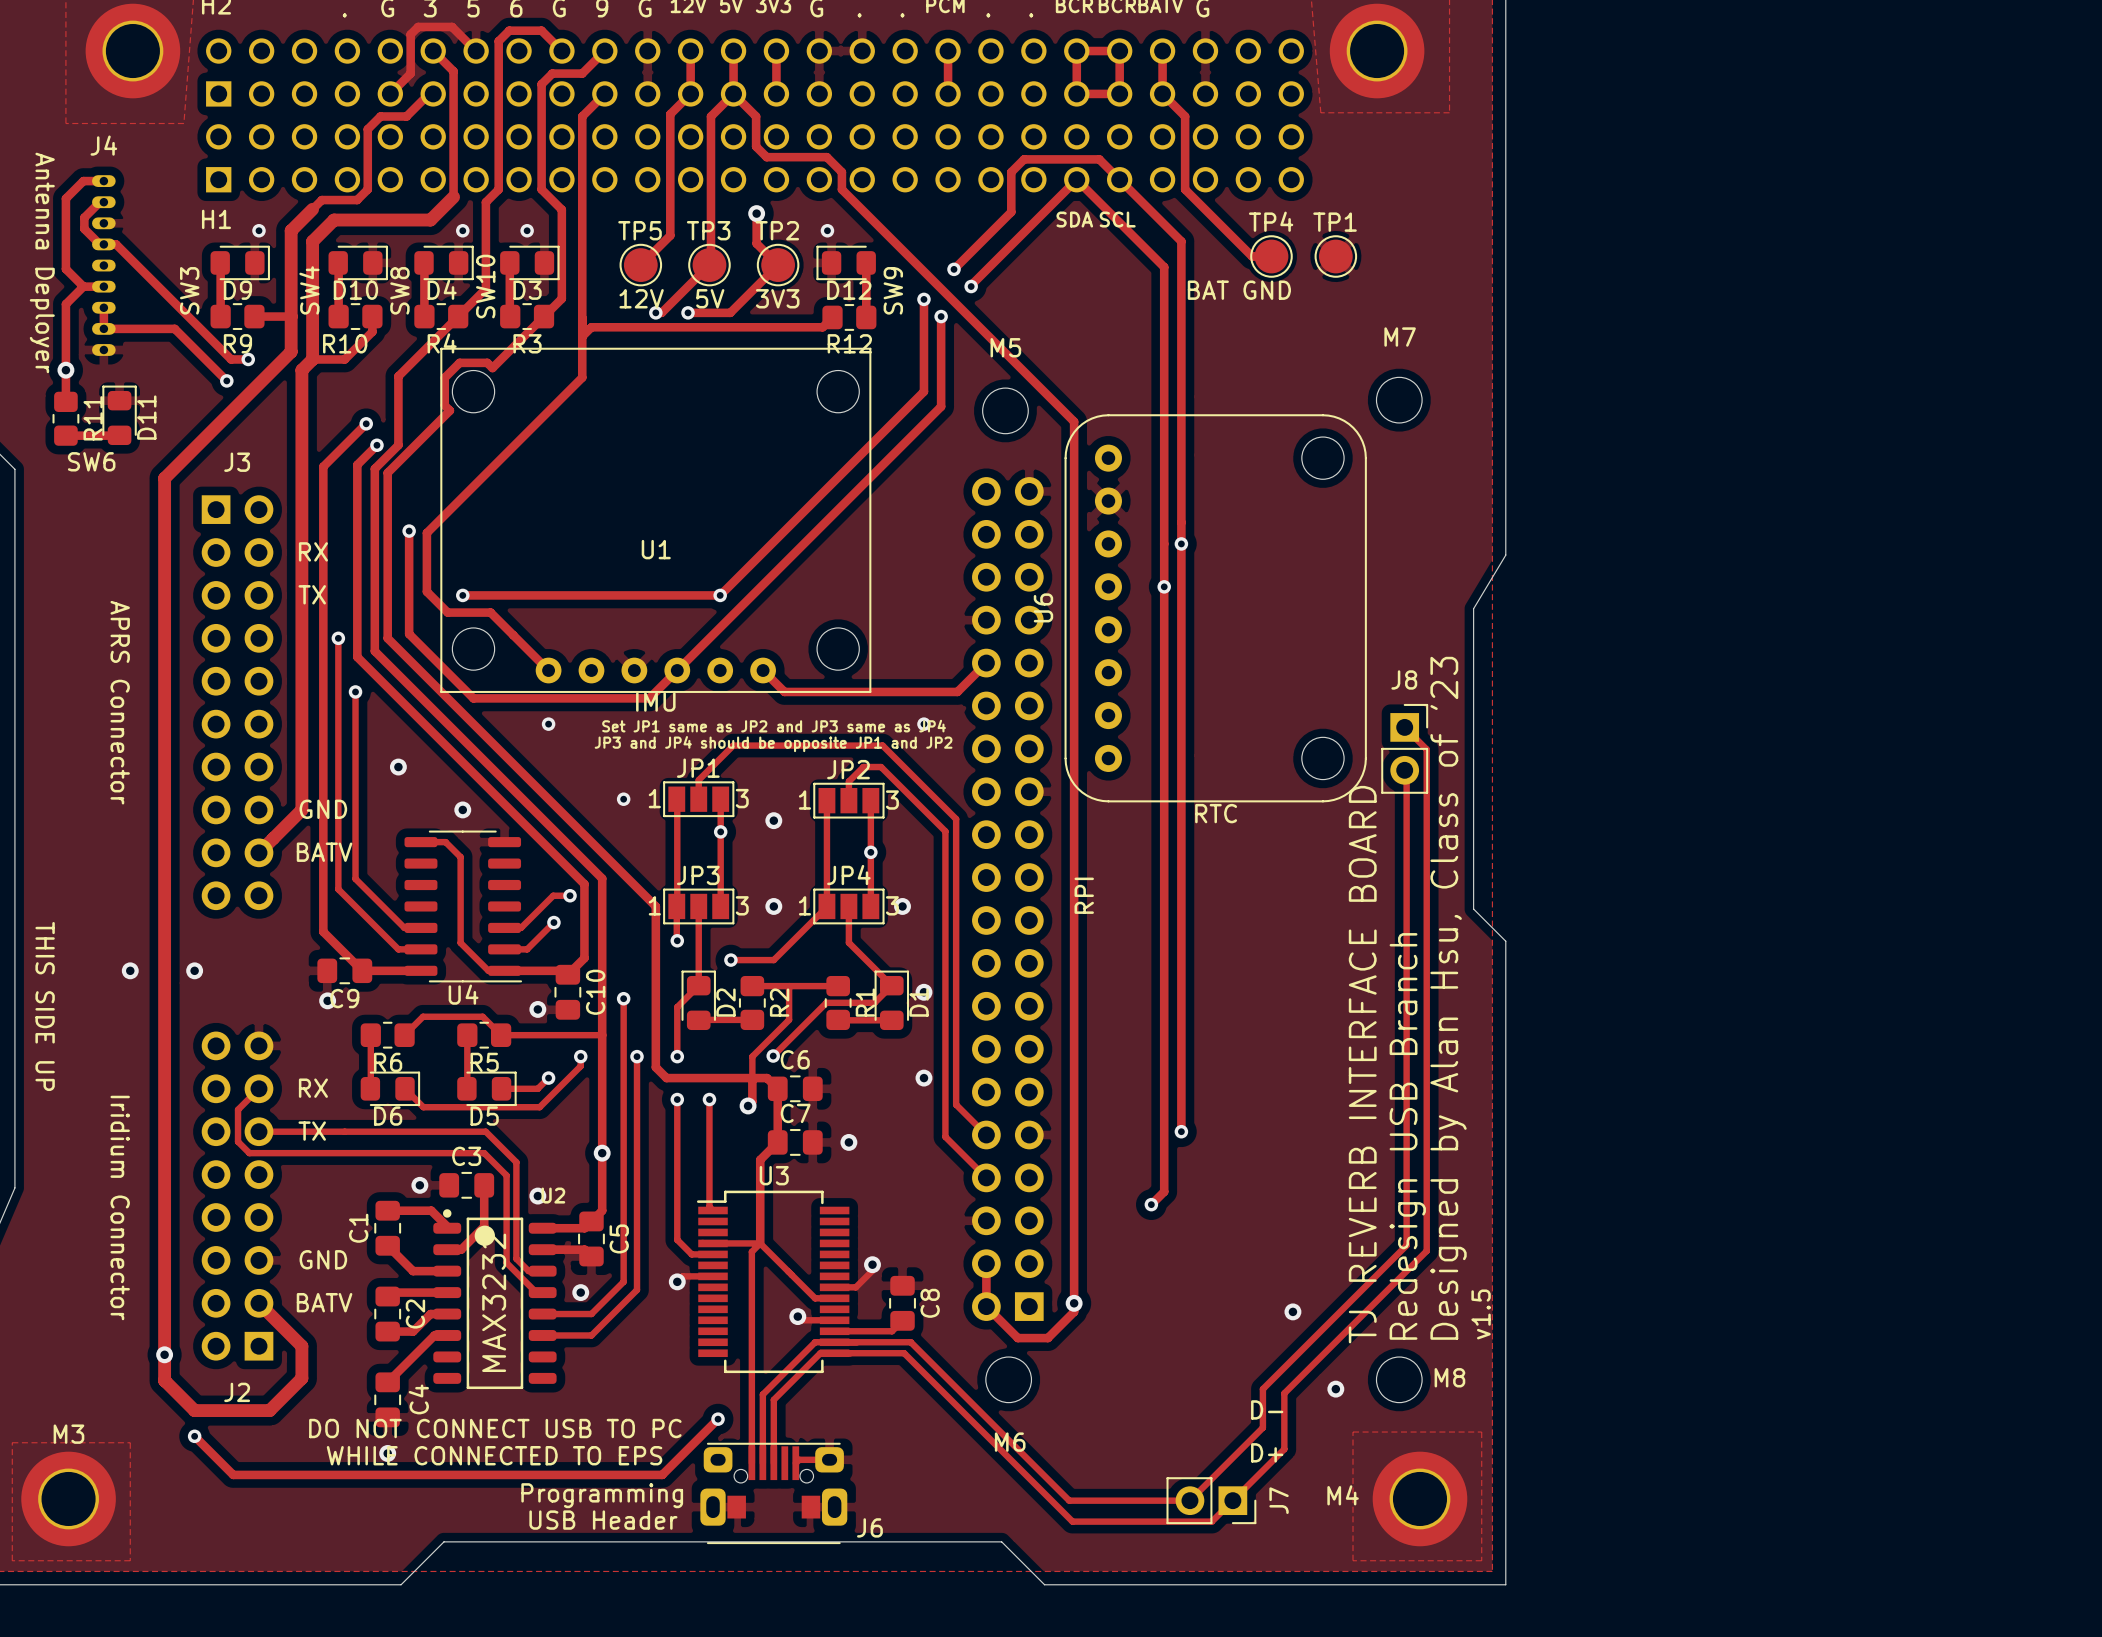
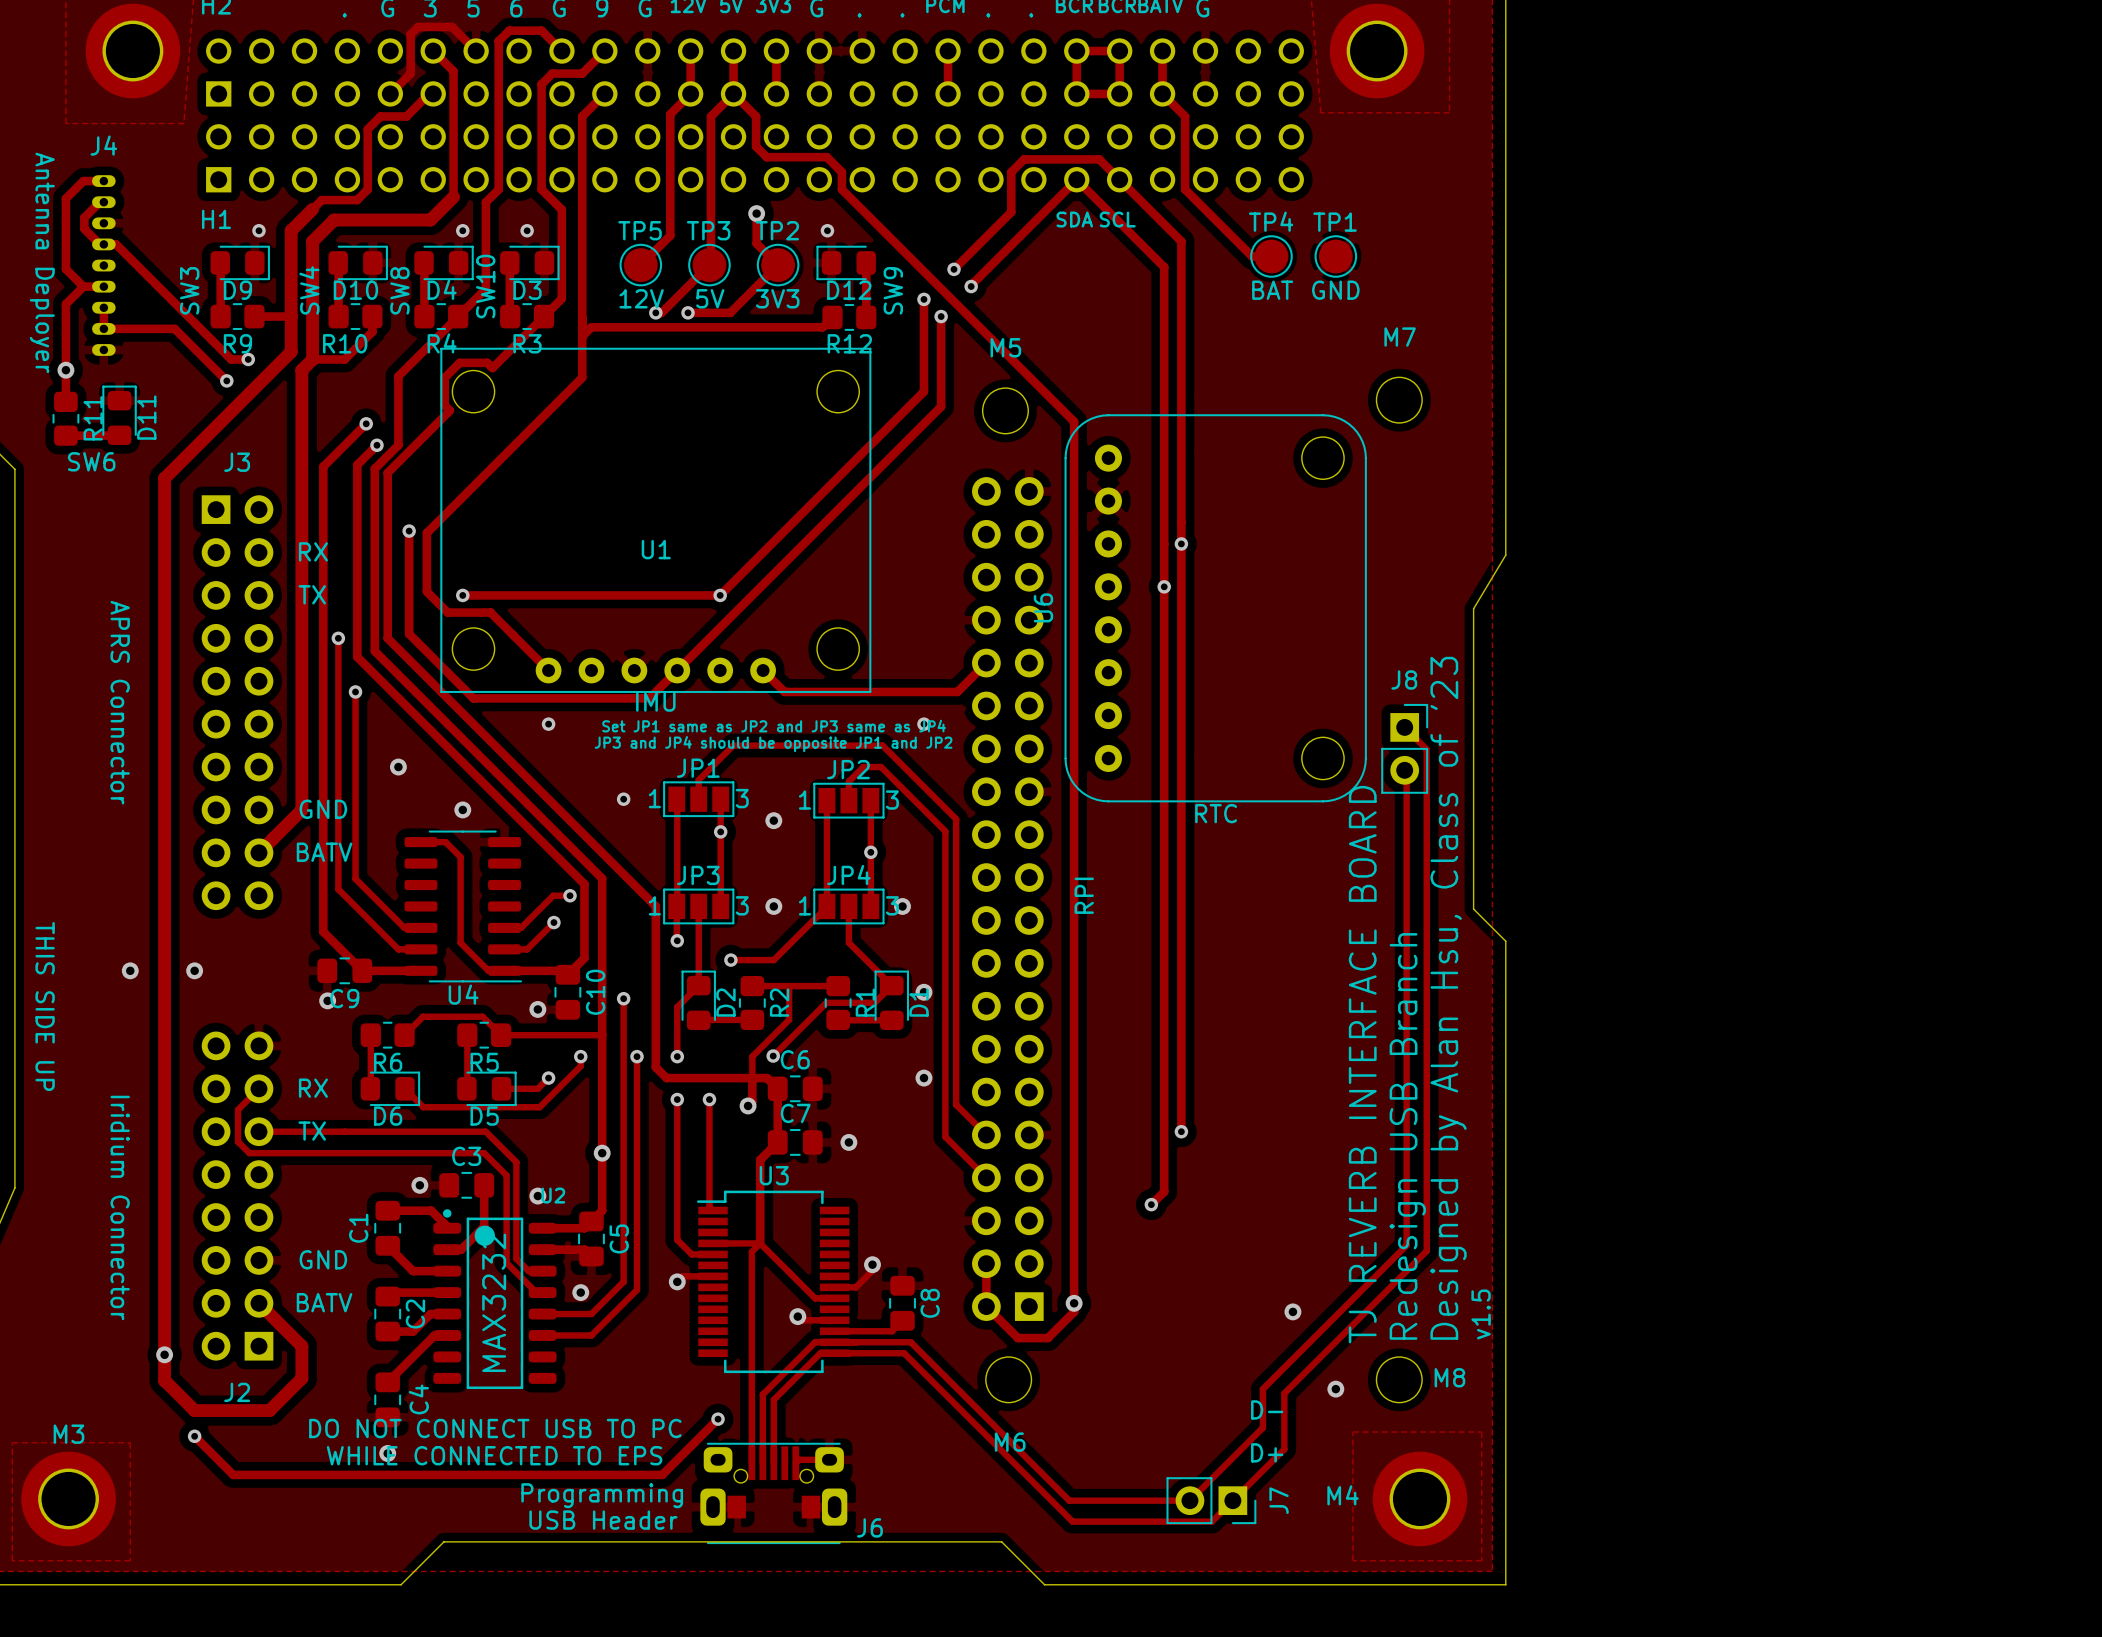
text position: BAT (1208, 290) -> BAT (1272, 290)
text position: GND (1267, 290) -> GND (1335, 290)

